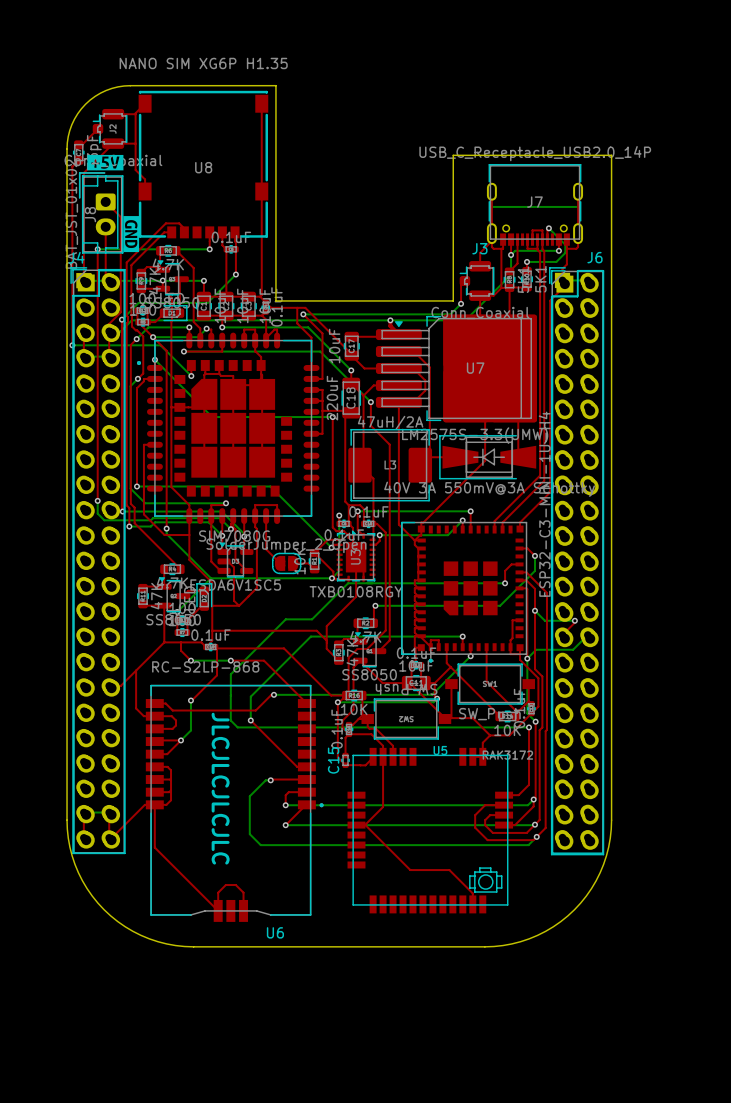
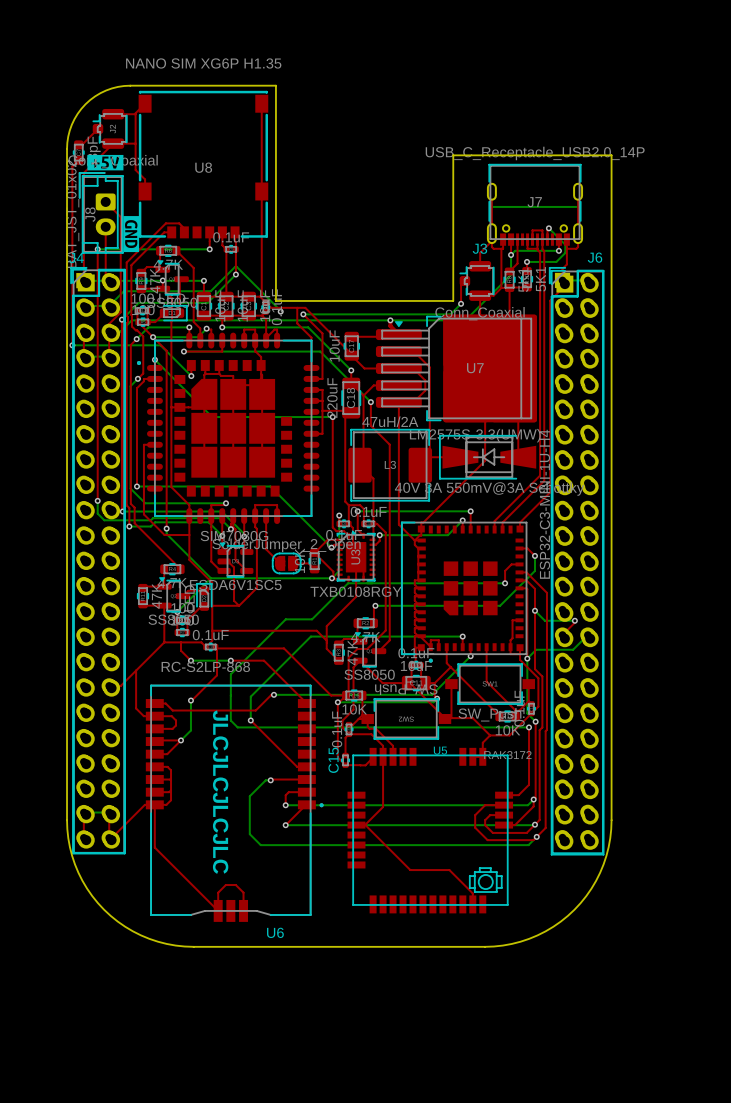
bottom track: none -> (83, 305) (109, 305) (123, 291) (210, 291) (236, 266) (280, 311)
via: none -> (280, 311)

